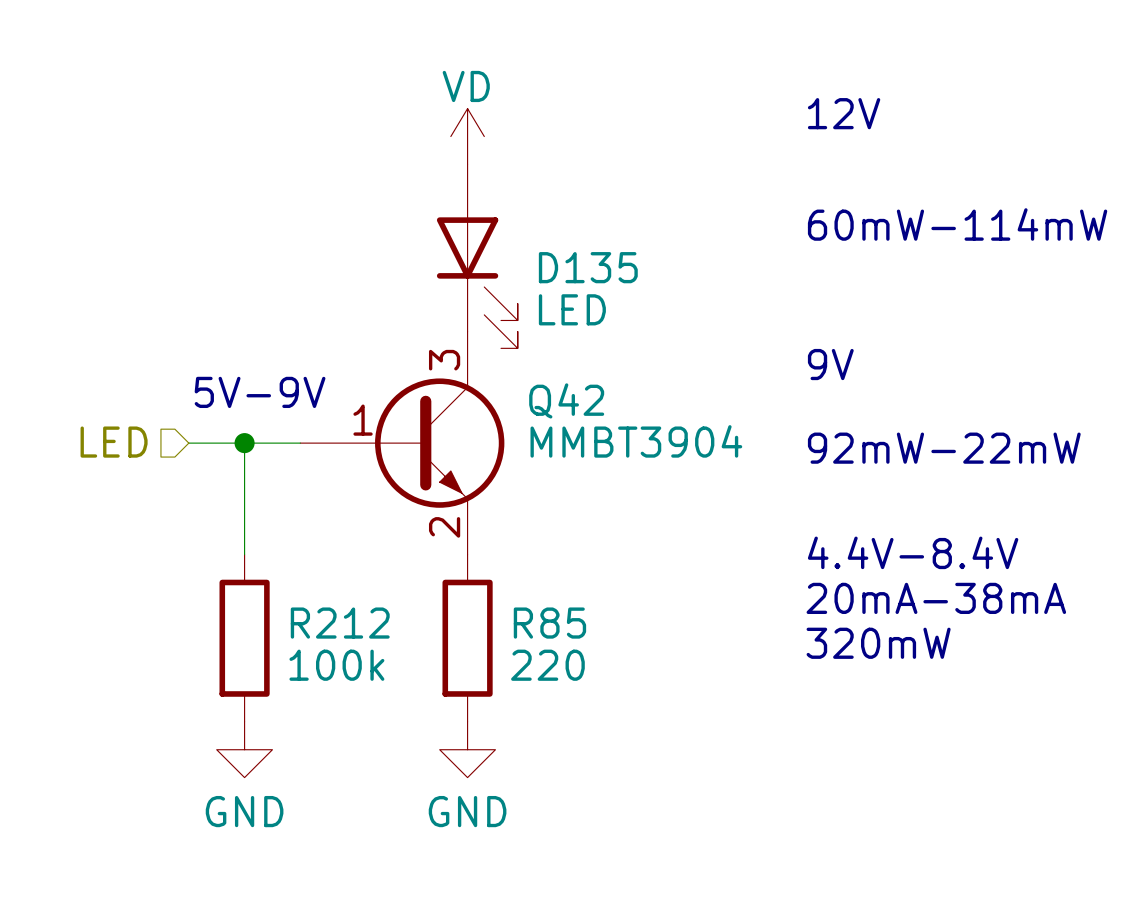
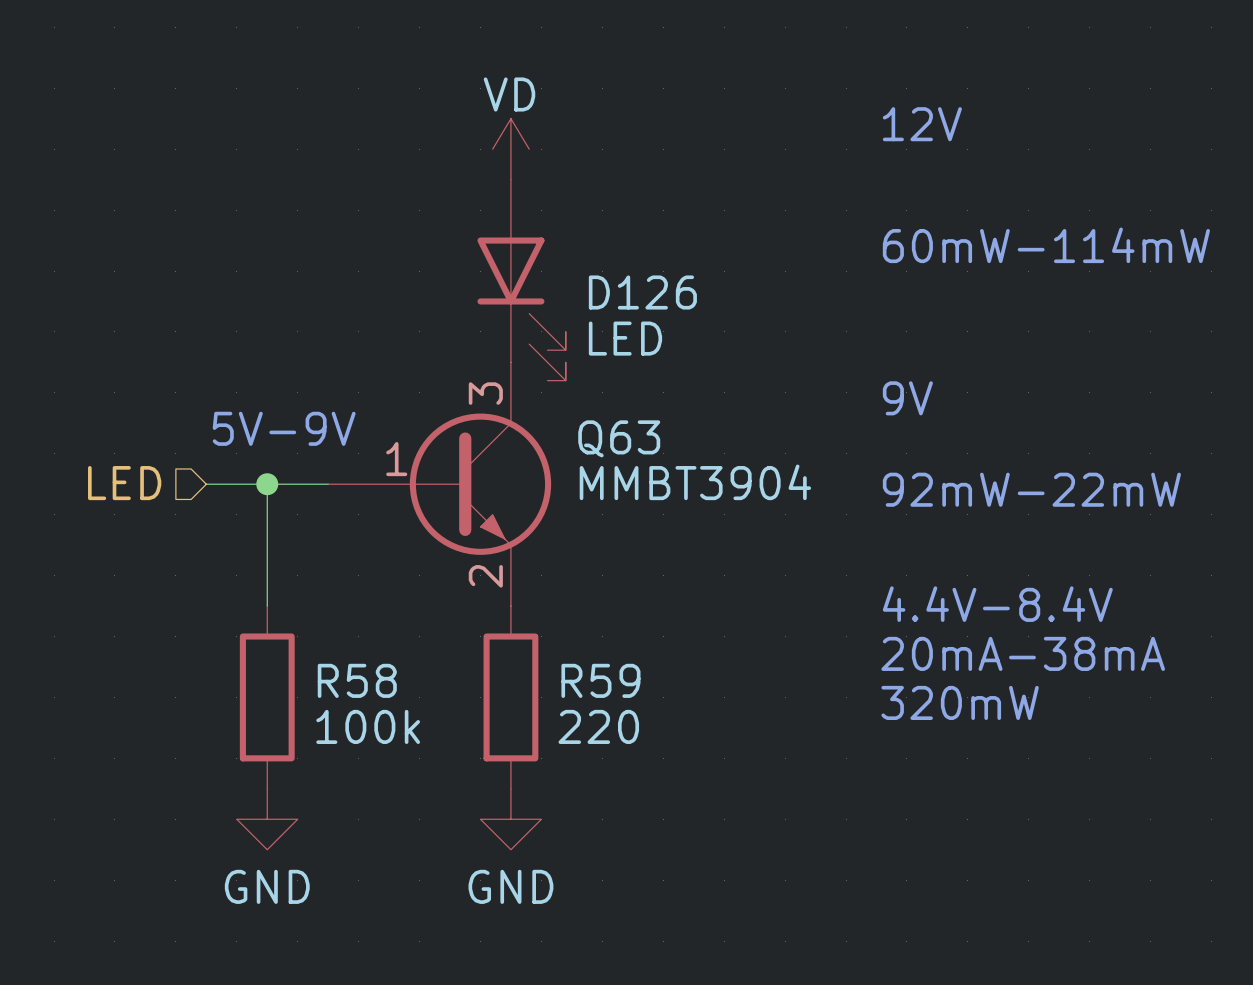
D135 name: D135 (588, 267) -> D126 (642, 292)
Q42 name: Q42 (566, 400) -> Q63 (619, 438)
R212 name: R212 (340, 623) -> R58 (357, 680)
R85 name: R85 (549, 623) -> R59 (600, 680)

